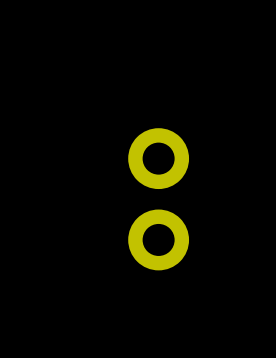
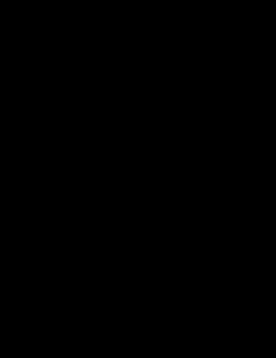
part: (158, 199) -> none

